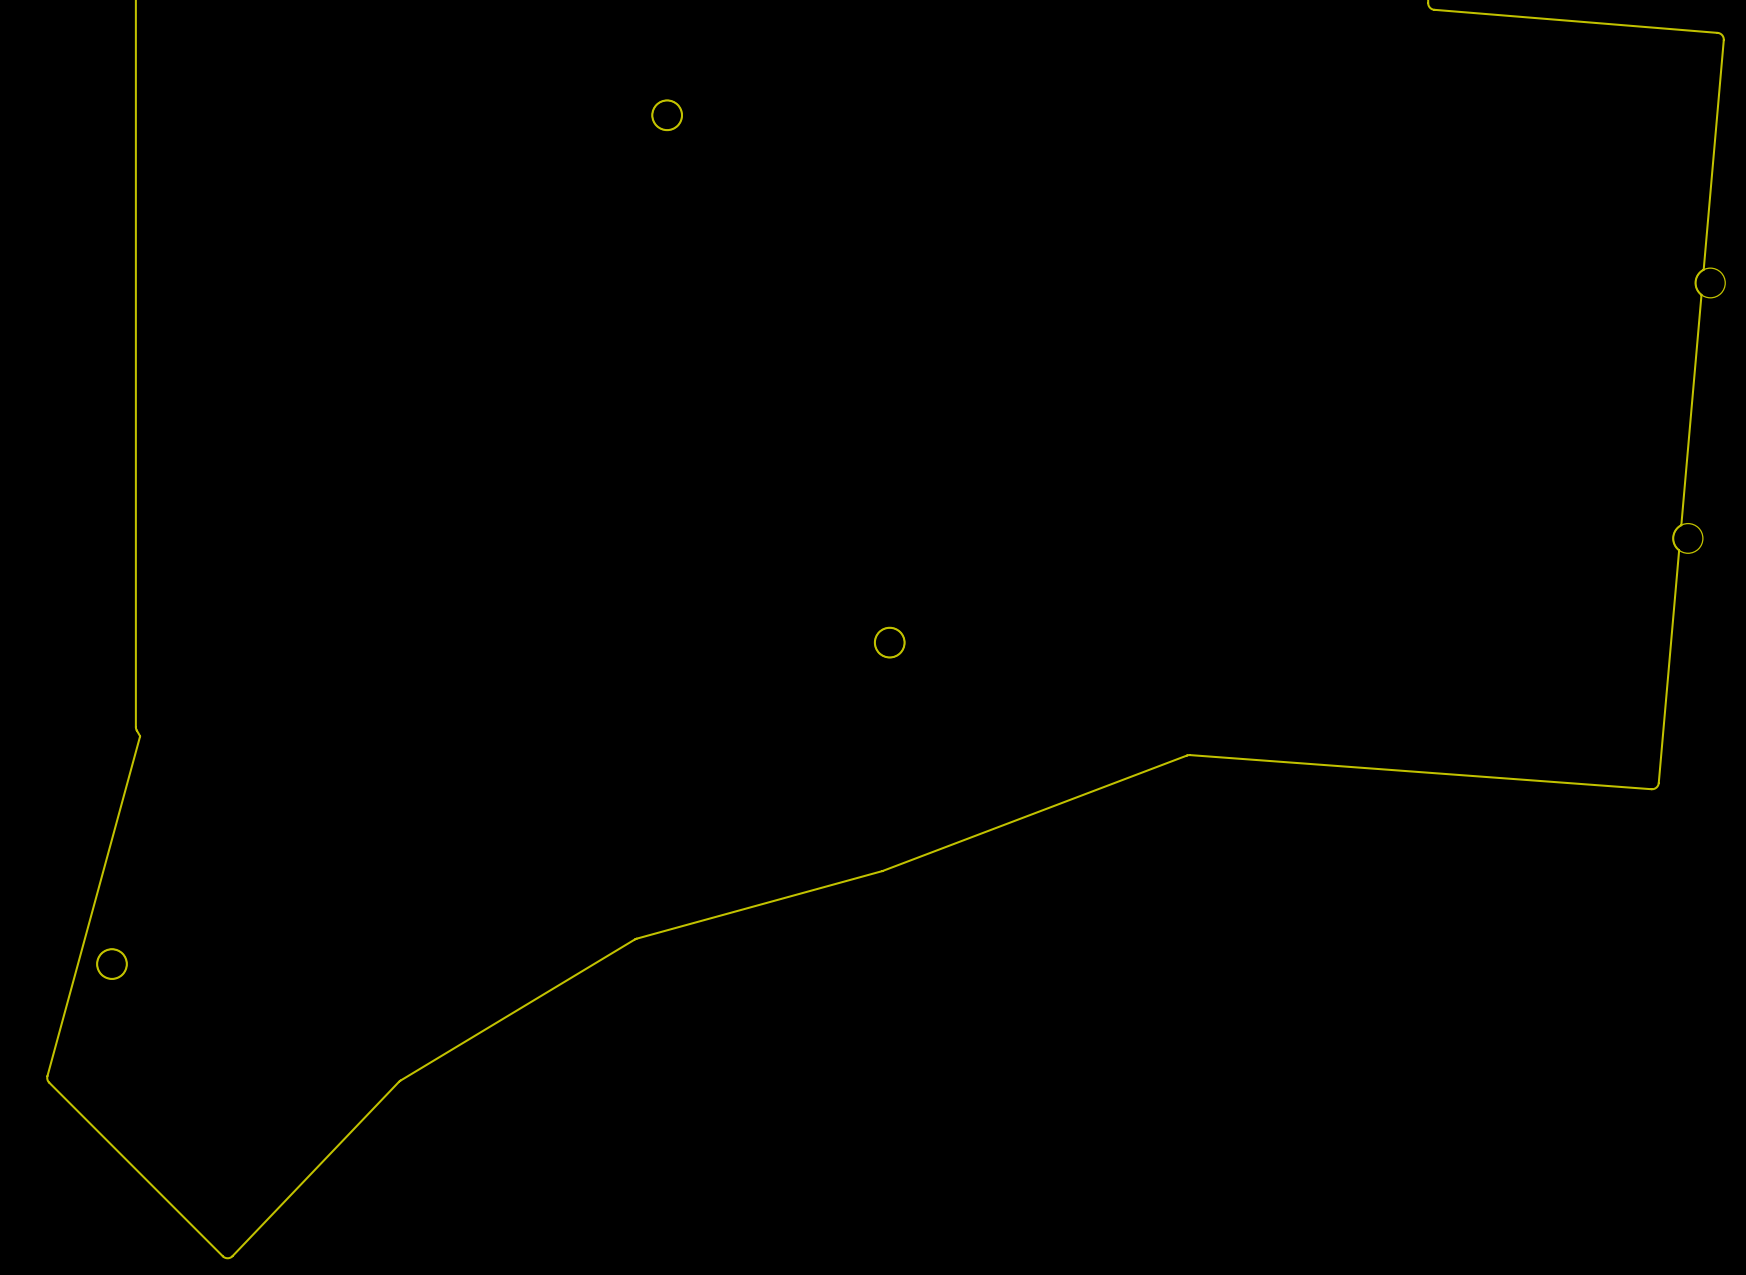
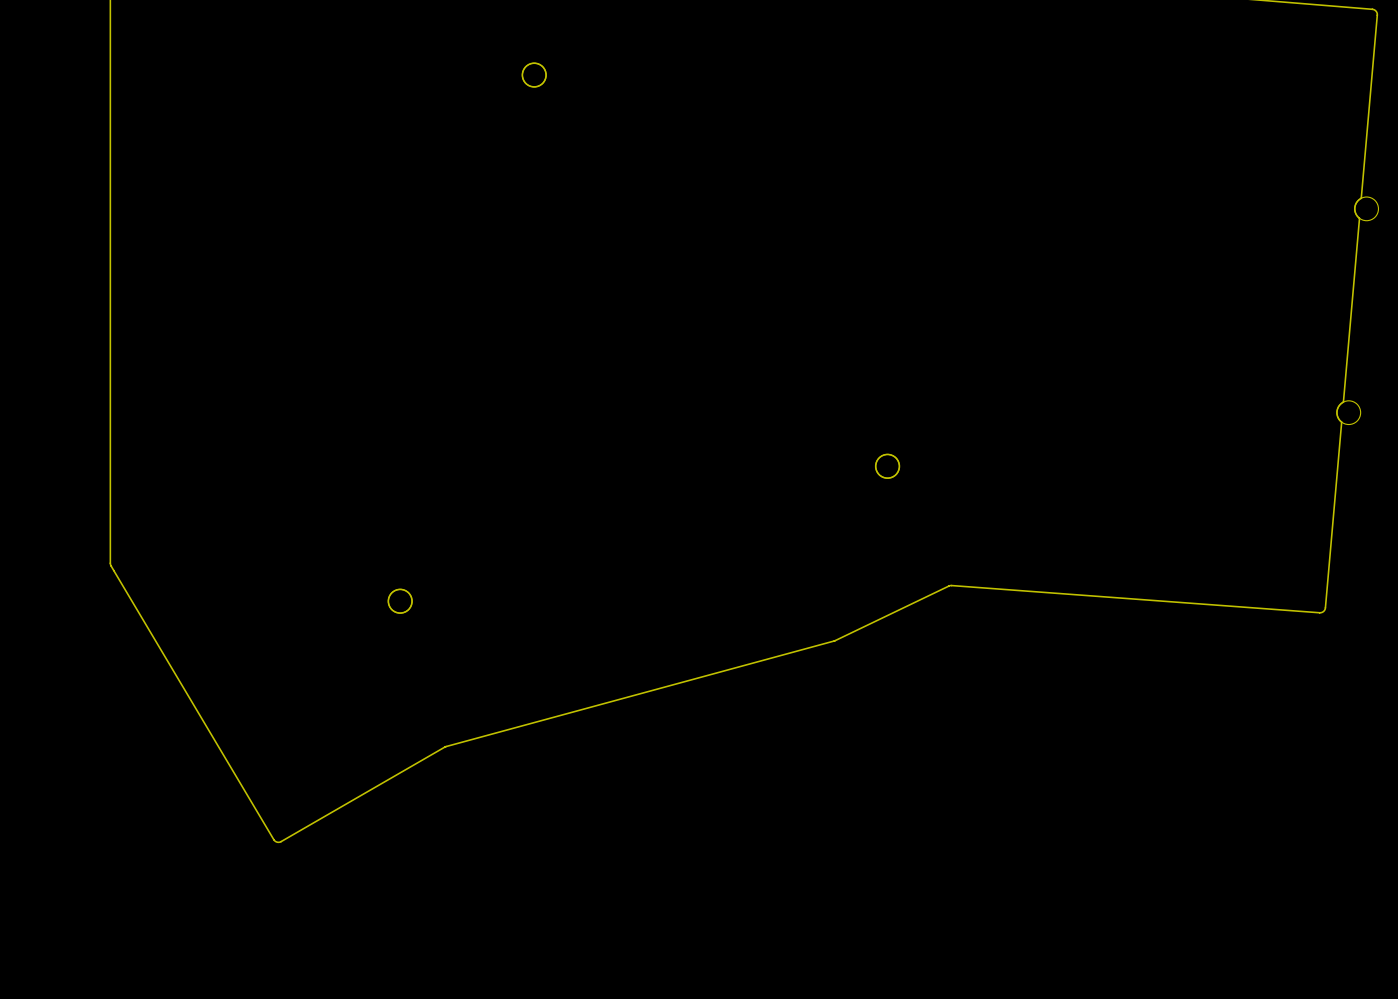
round board edge: none -> [874, 453, 901, 479]
round board edge: [873, 626, 906, 659] -> none
board edge: (140, 736) (47, 1078) (222, 1256) (227, 1258) (232, 1256) (399, 1081) (635, 939) (882, 871) (1190, 755) -> (113, 570) (273, 839) (278, 842) (445, 746) (834, 640) (951, 585)
round board edge: none -> [387, 588, 413, 614]
round board edge: [96, 948, 128, 980] -> none

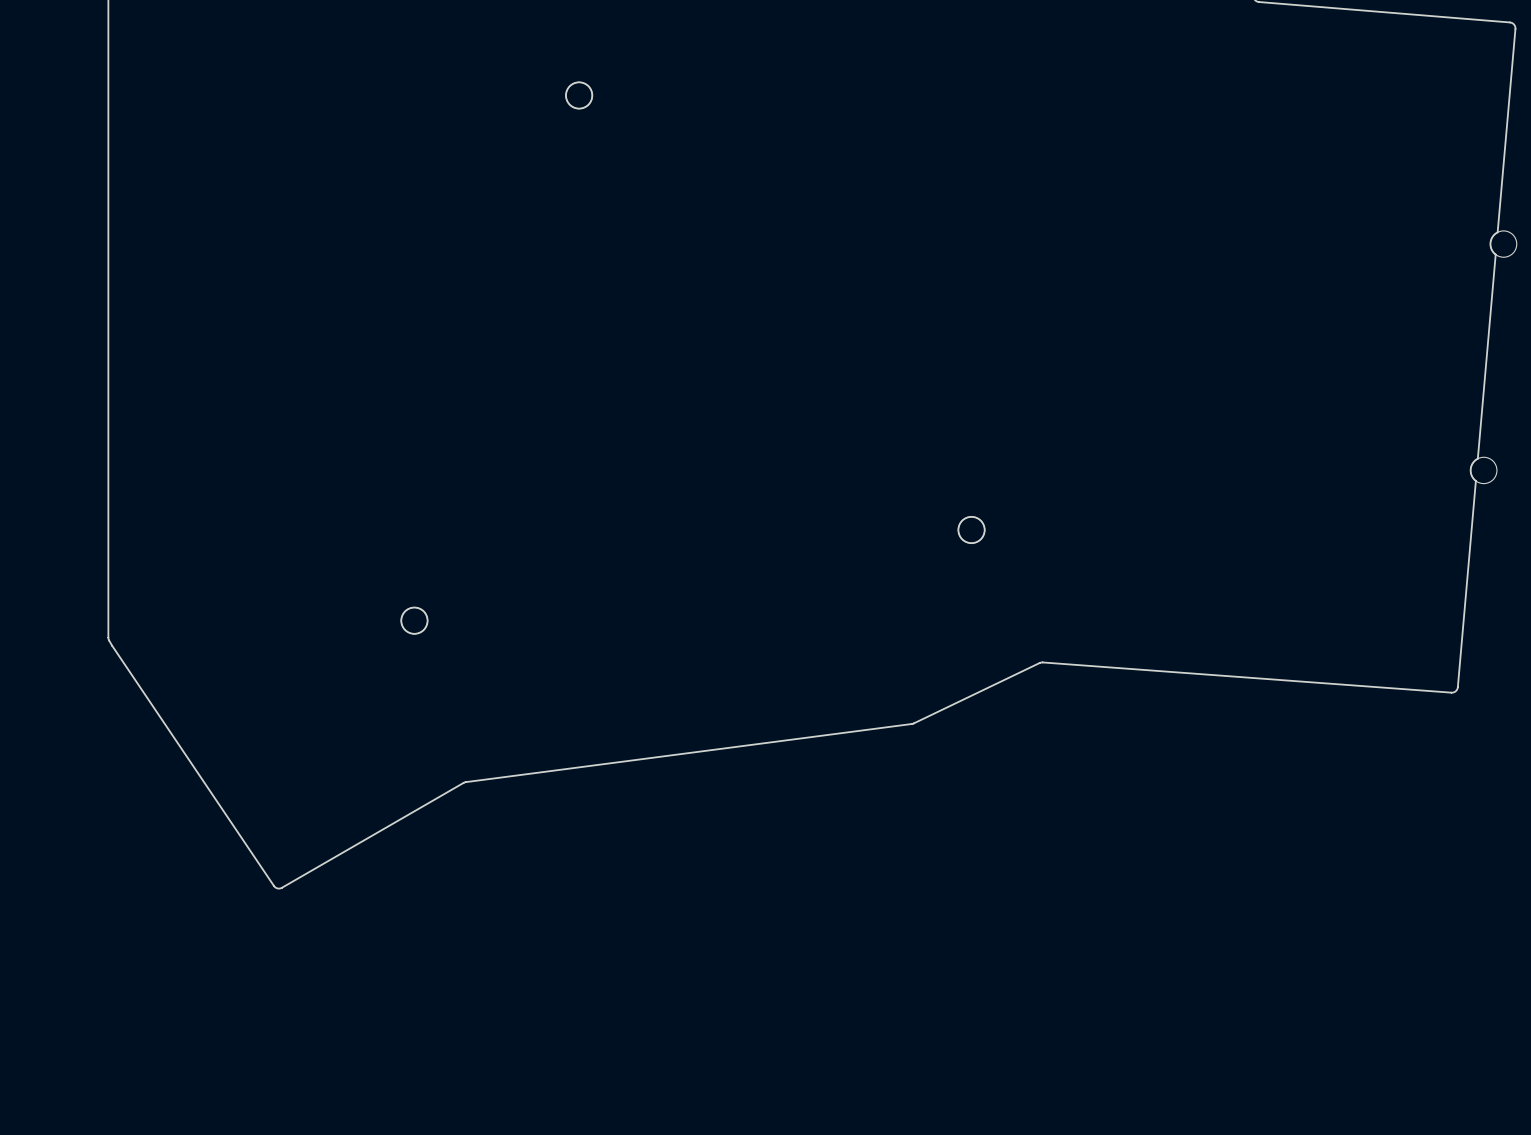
board edge: (113, 570) (273, 839) (277, 842) (445, 746) (835, 640) -> (112, 645) (273, 885) (278, 888) (465, 782) (913, 723)
round board edge position: (400, 601) -> (414, 620)

